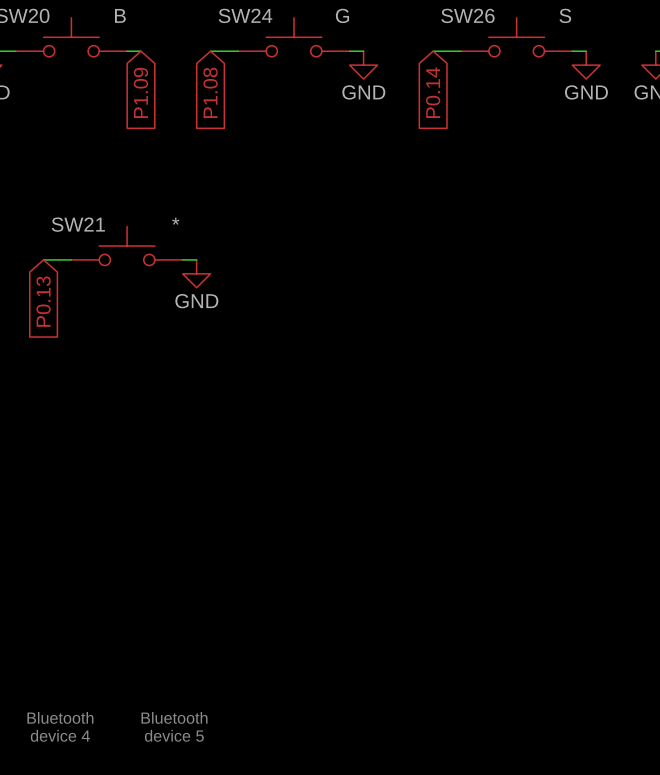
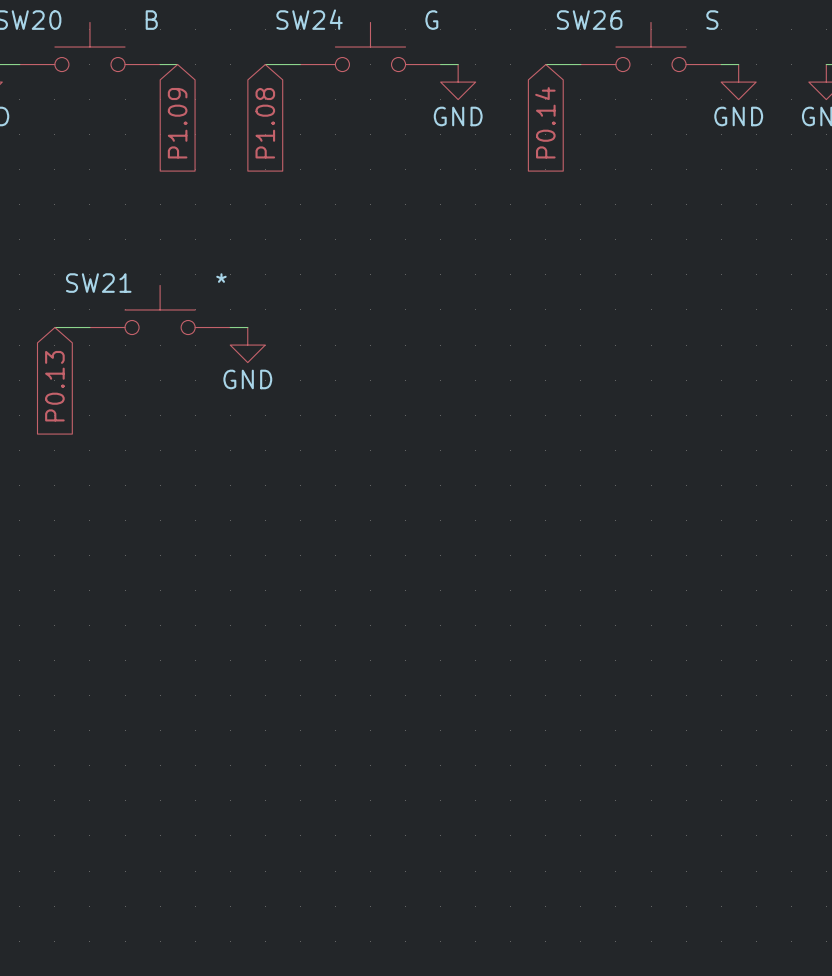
text: Bluetooth (60, 717) -> none
text: Bluetooth (174, 717) -> none
text: device 4 (60, 735) -> none
text: device 5 (174, 735) -> none

